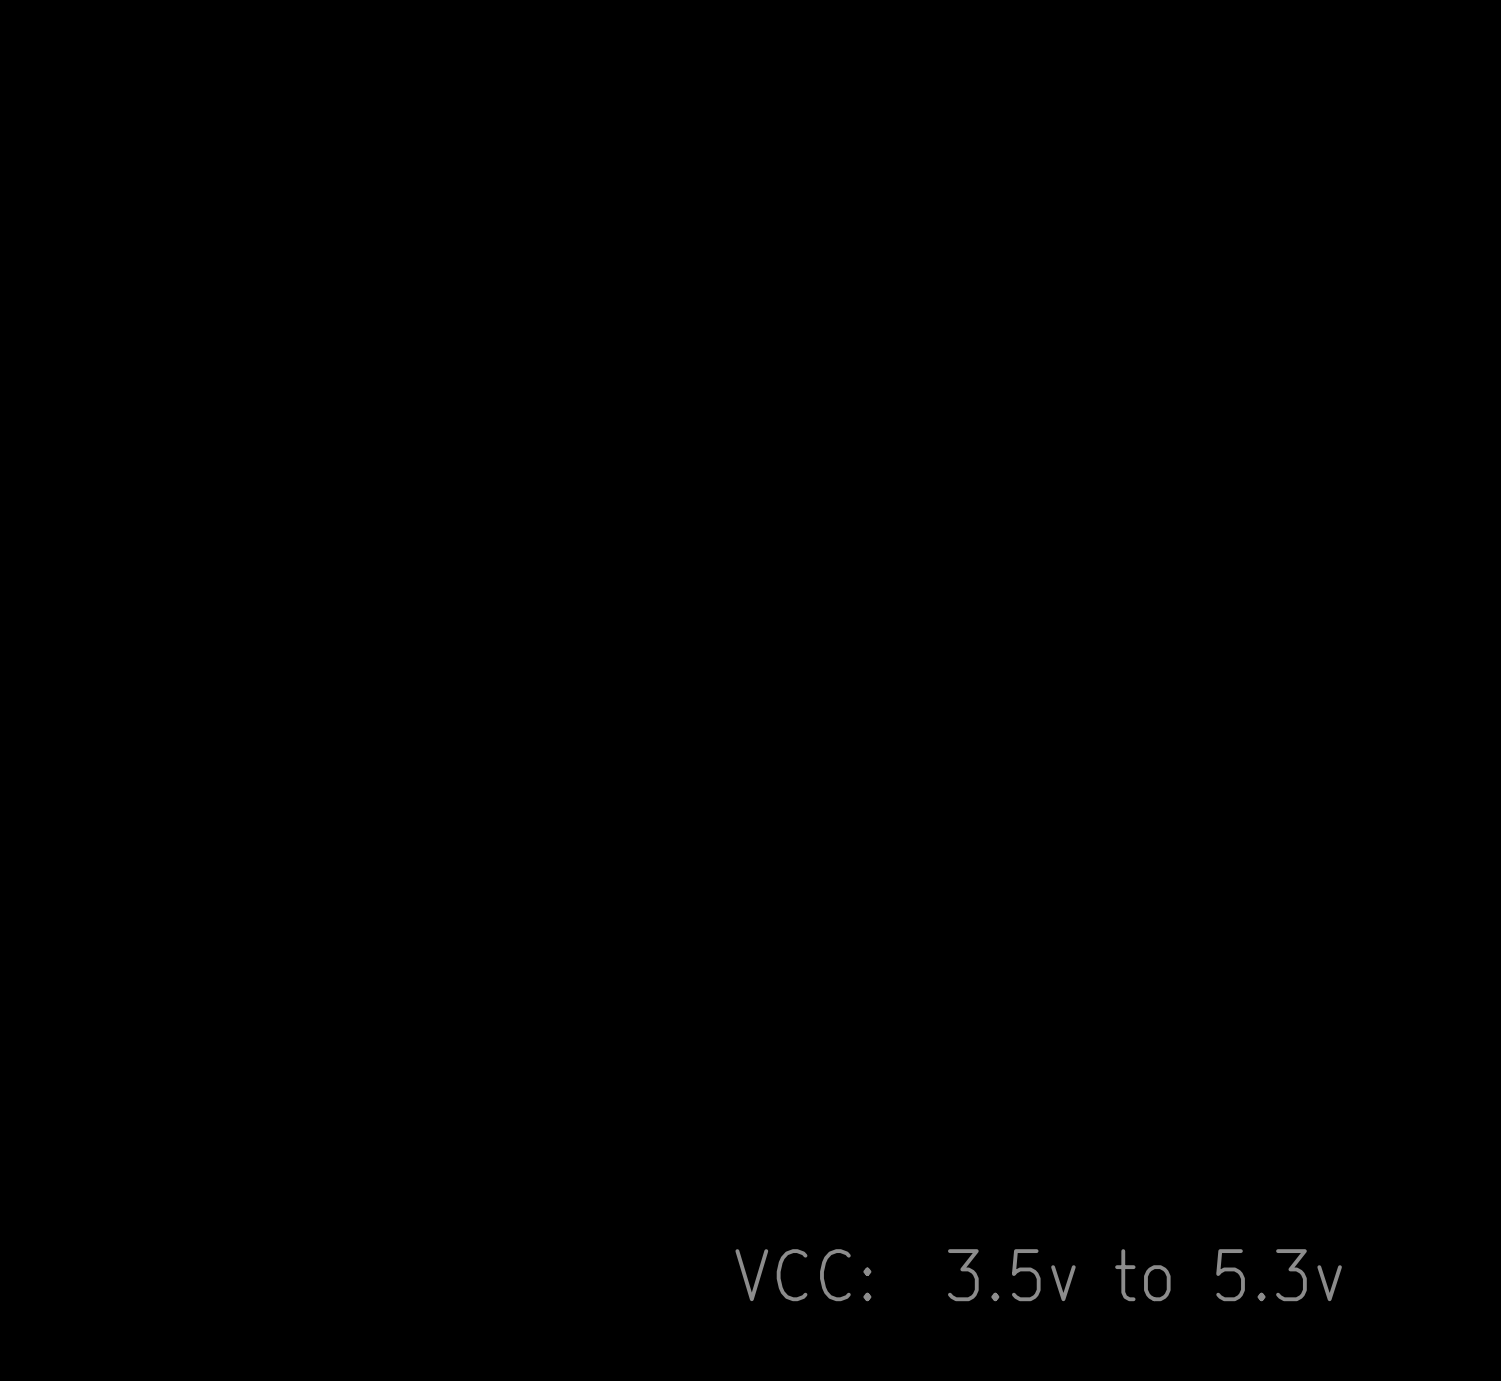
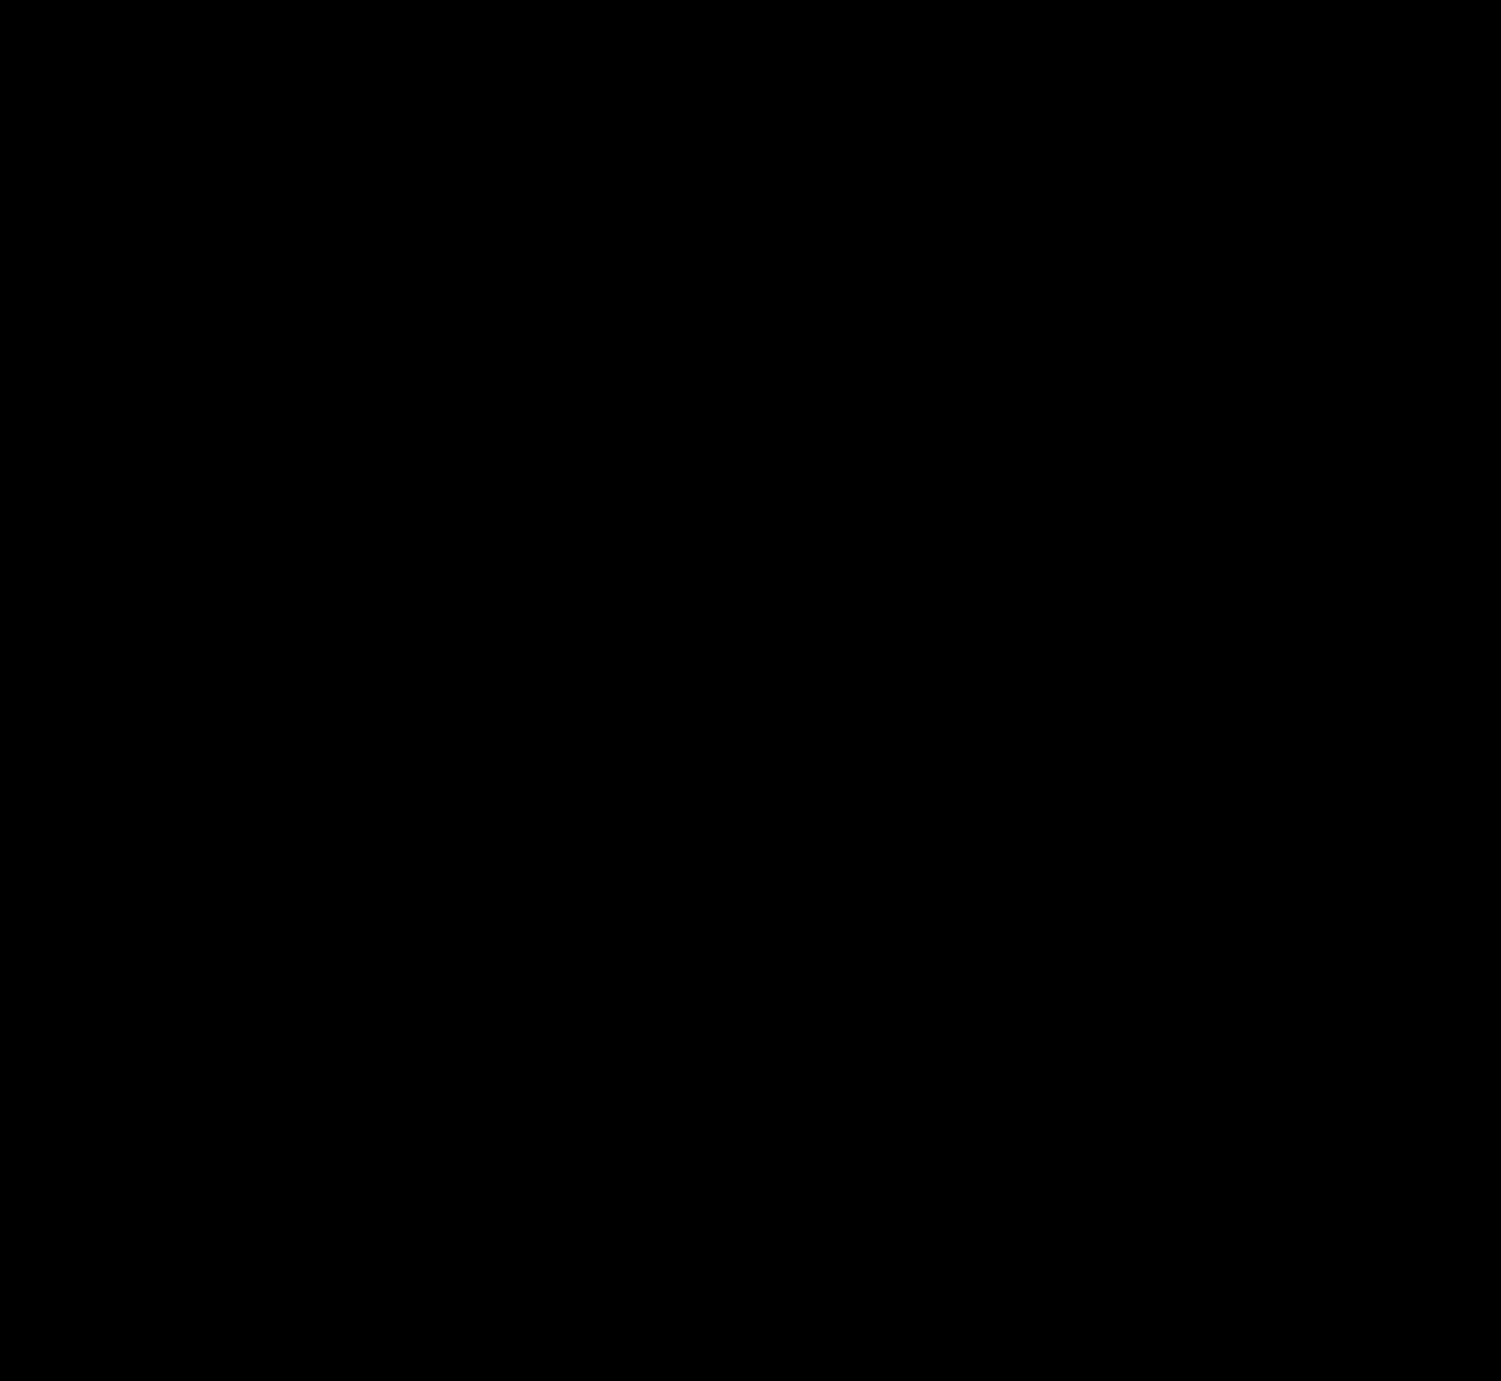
text: VCC: 3.5v to 5.3v (1038, 1275) -> none

